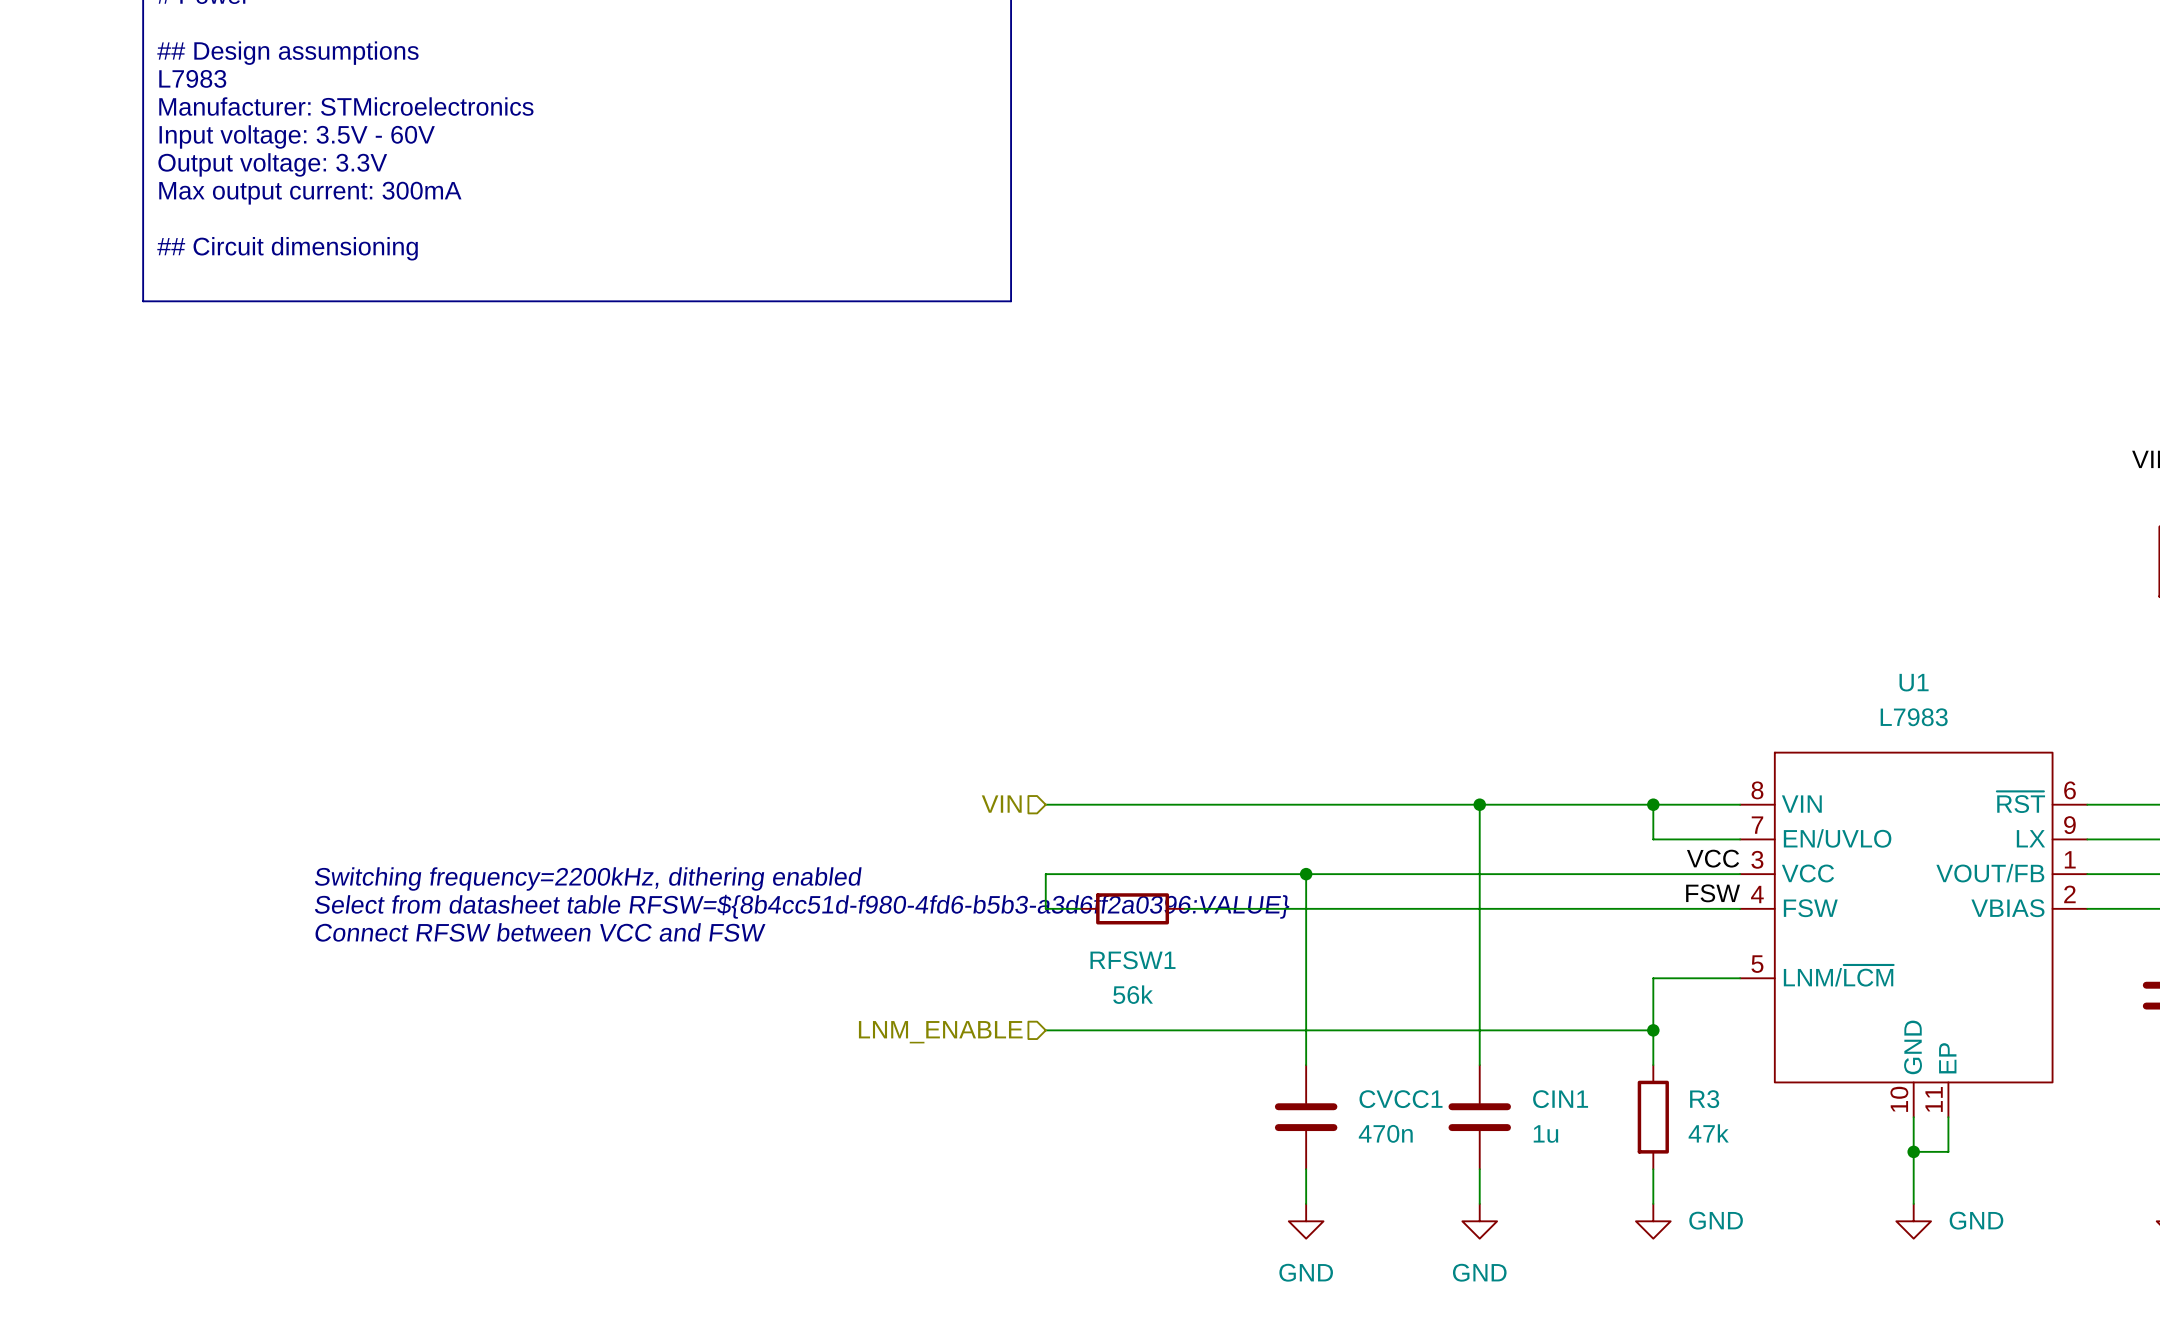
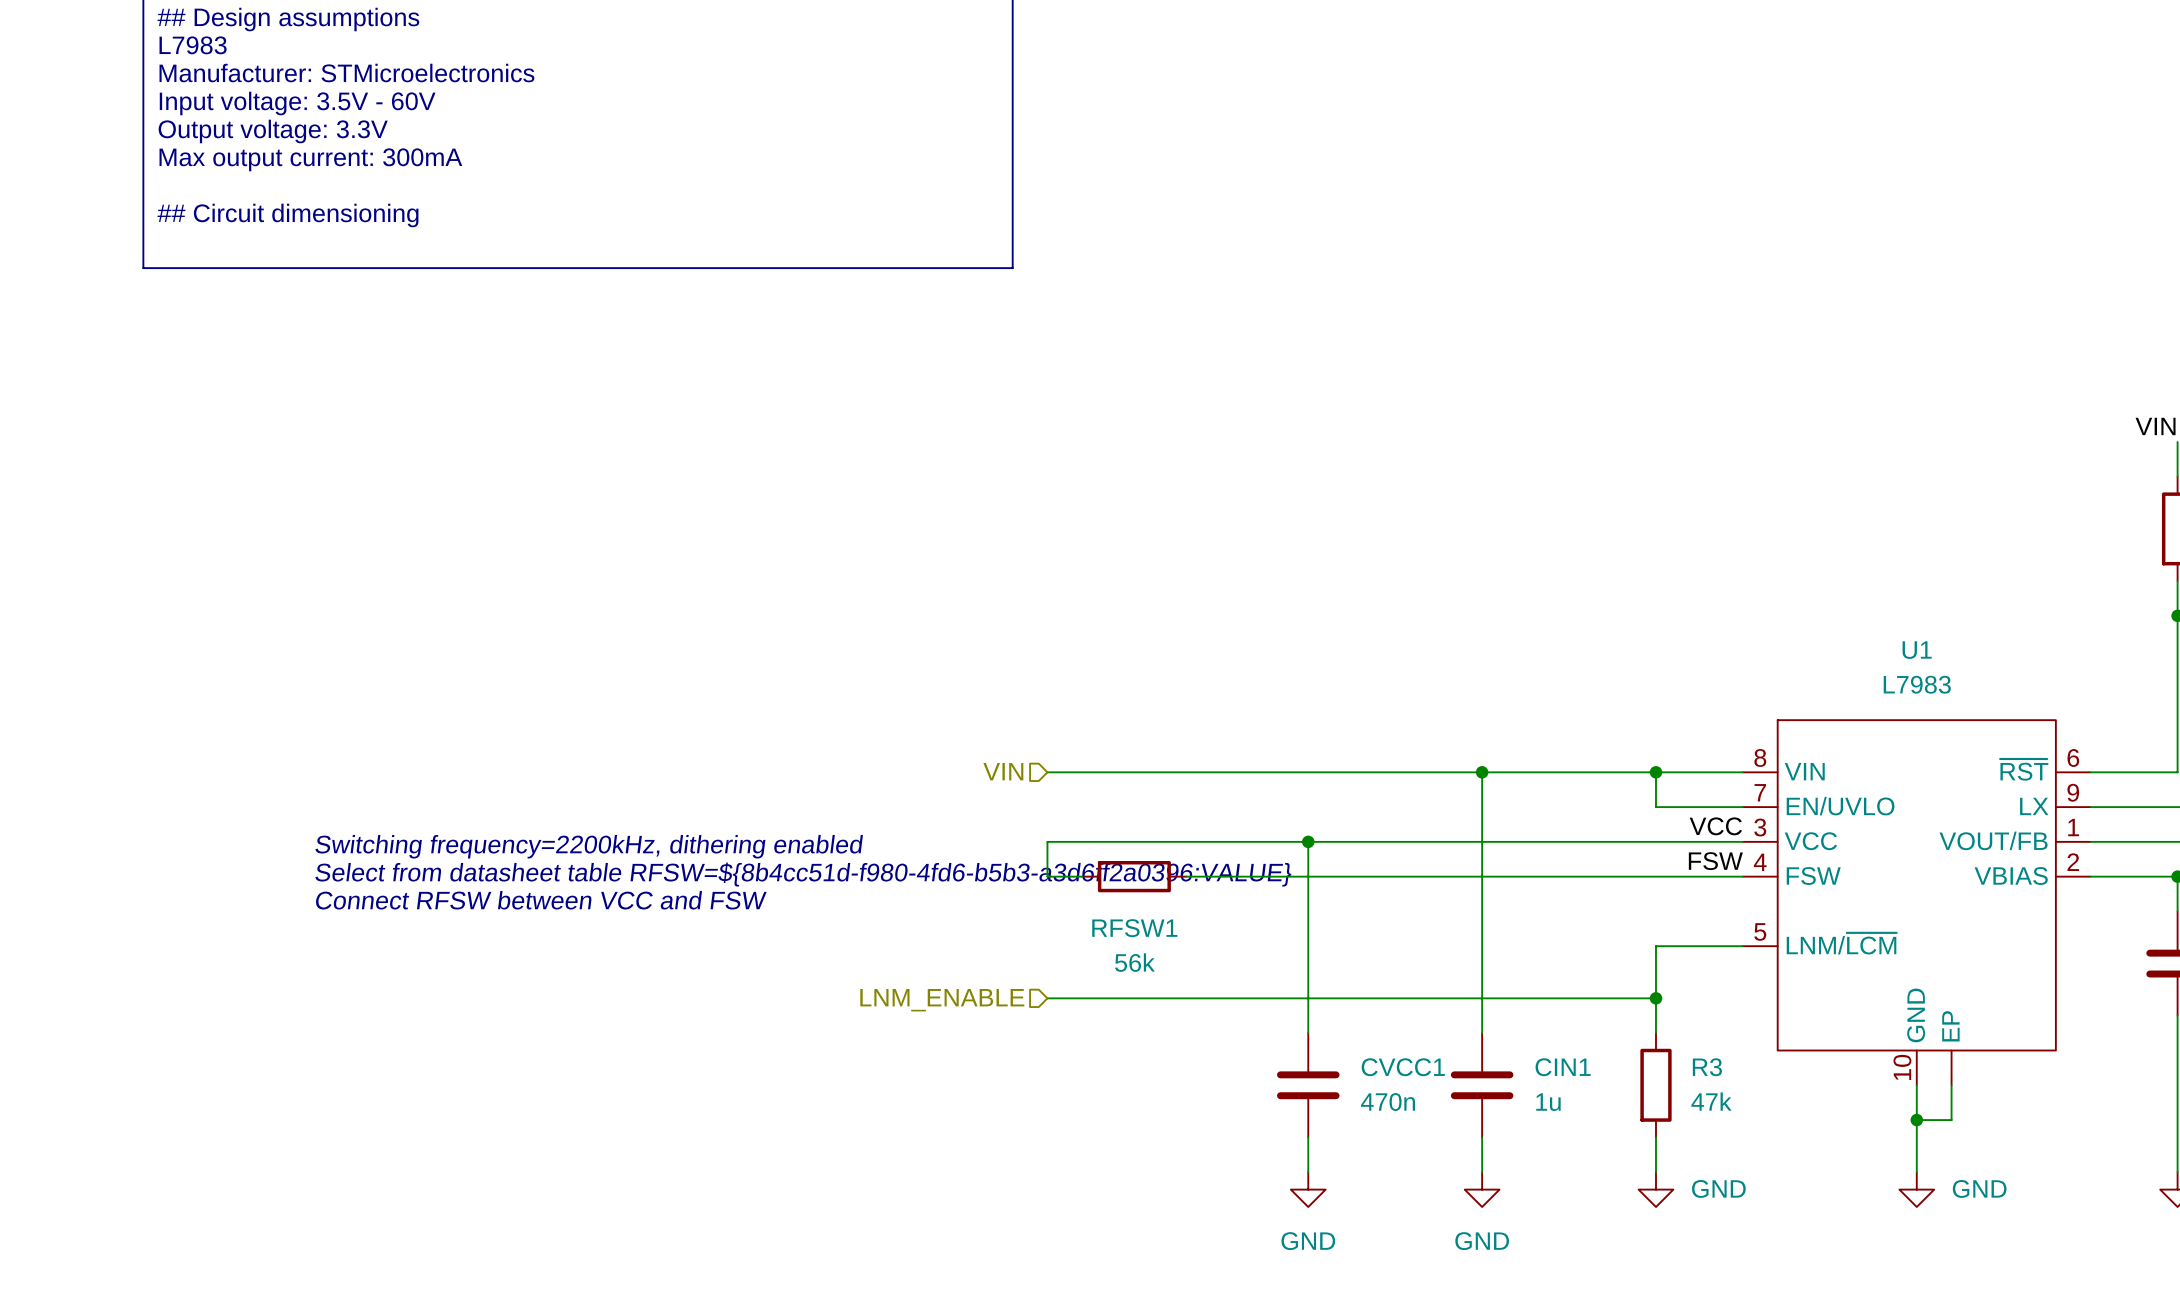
U1 pin number: 11 (1934, 1099) -> none

